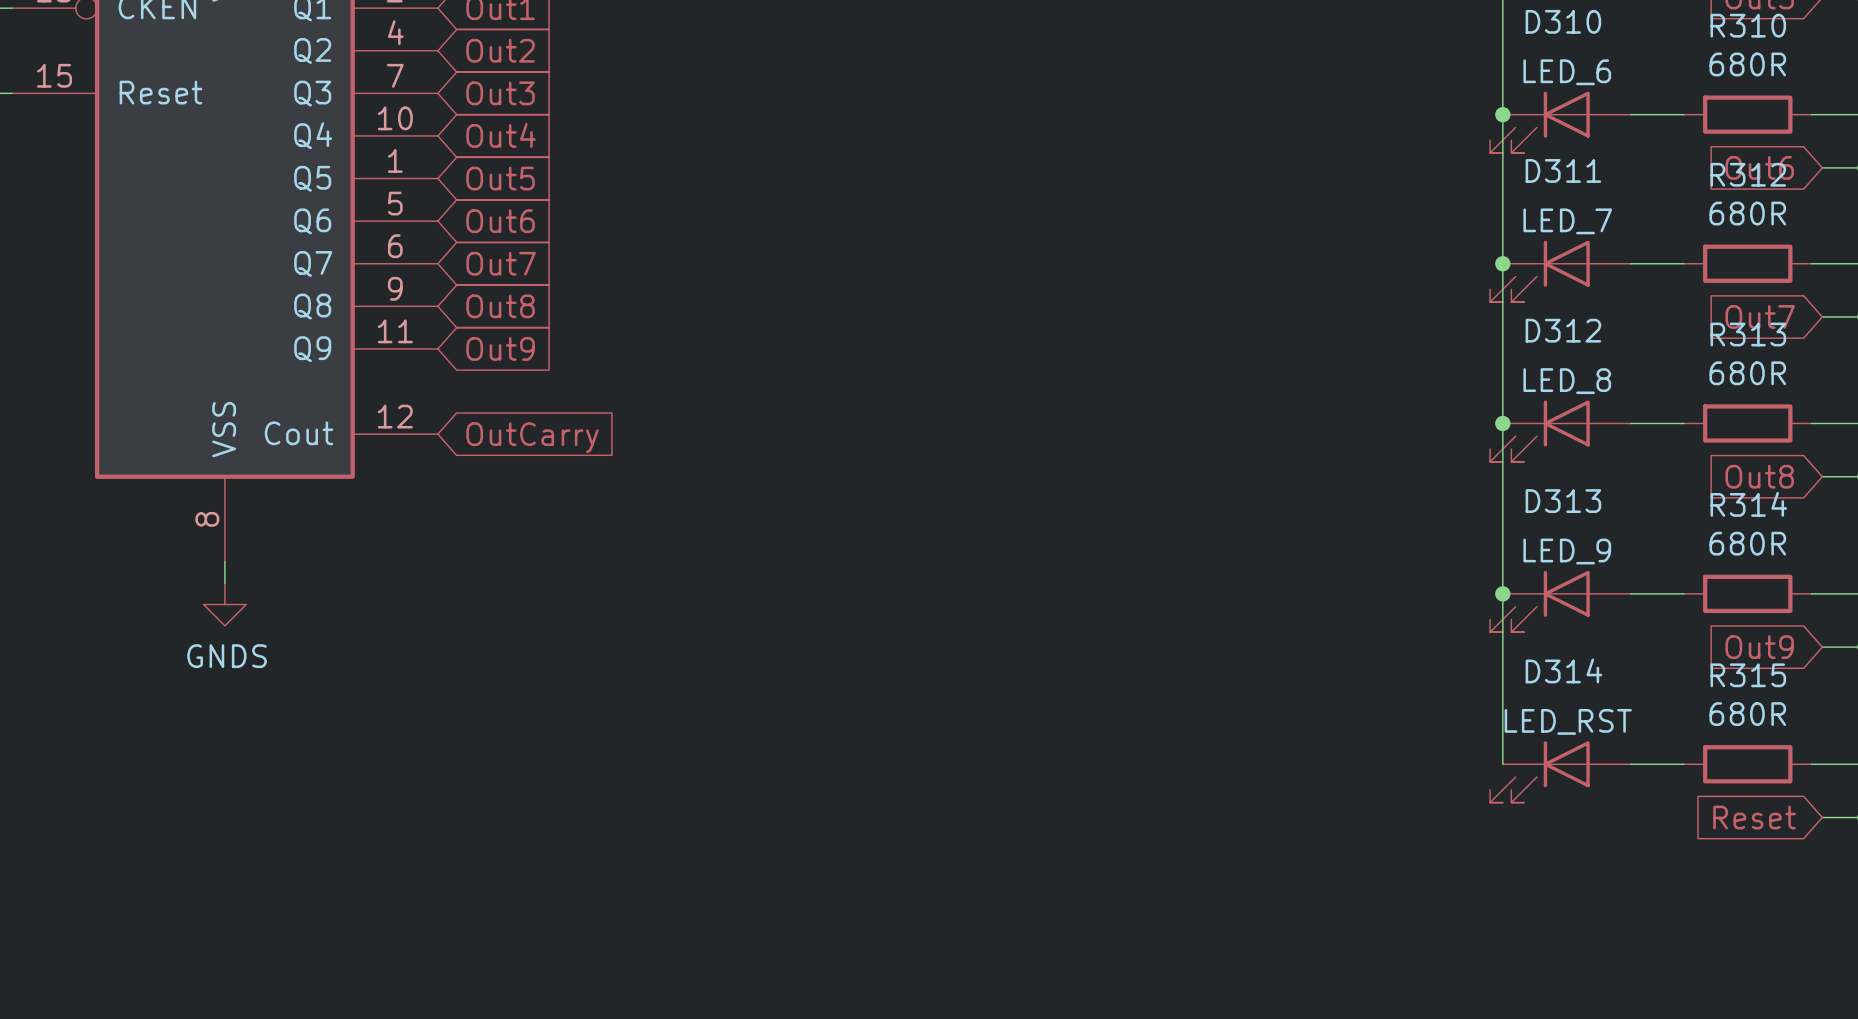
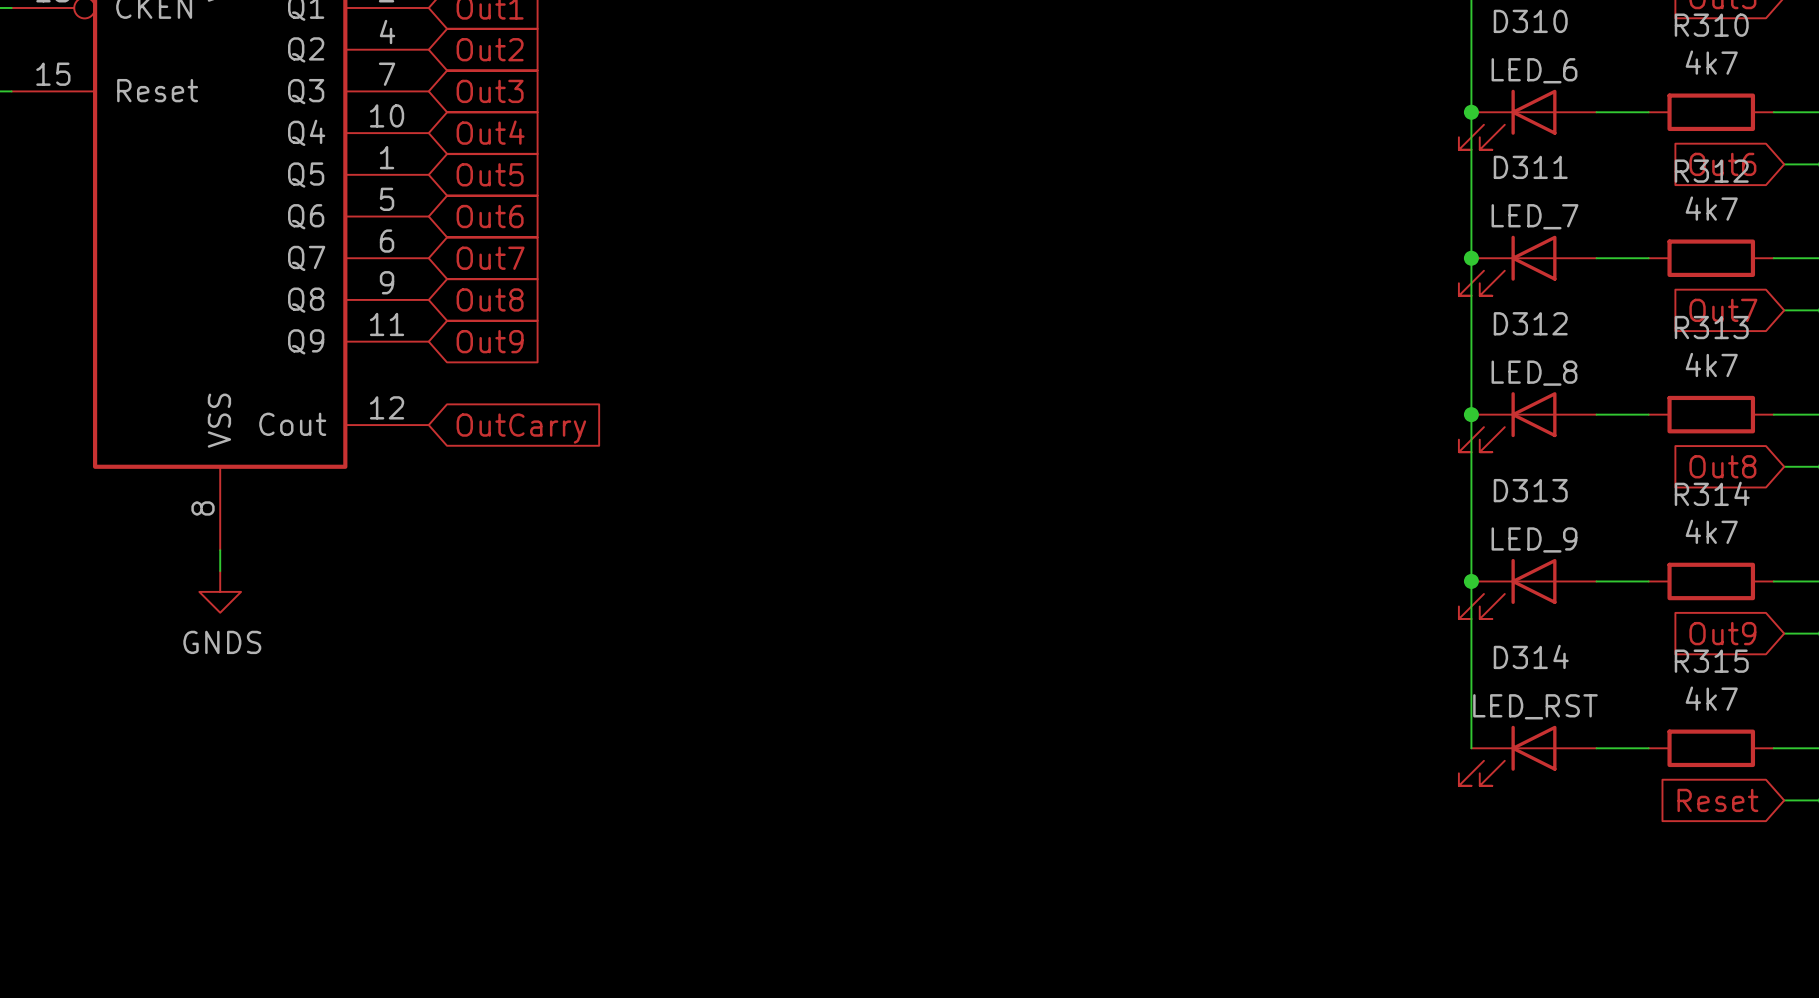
R310 value: 680R (1747, 64) -> 4k7 (1711, 62)
R312 value: 680R (1747, 213) -> 4k7 (1711, 208)
R313 value: 680R (1747, 373) -> 4k7 (1711, 364)
R314 value: 680R (1747, 543) -> 4k7 (1711, 531)
R315 value: 680R (1747, 714) -> 4k7 (1711, 698)

